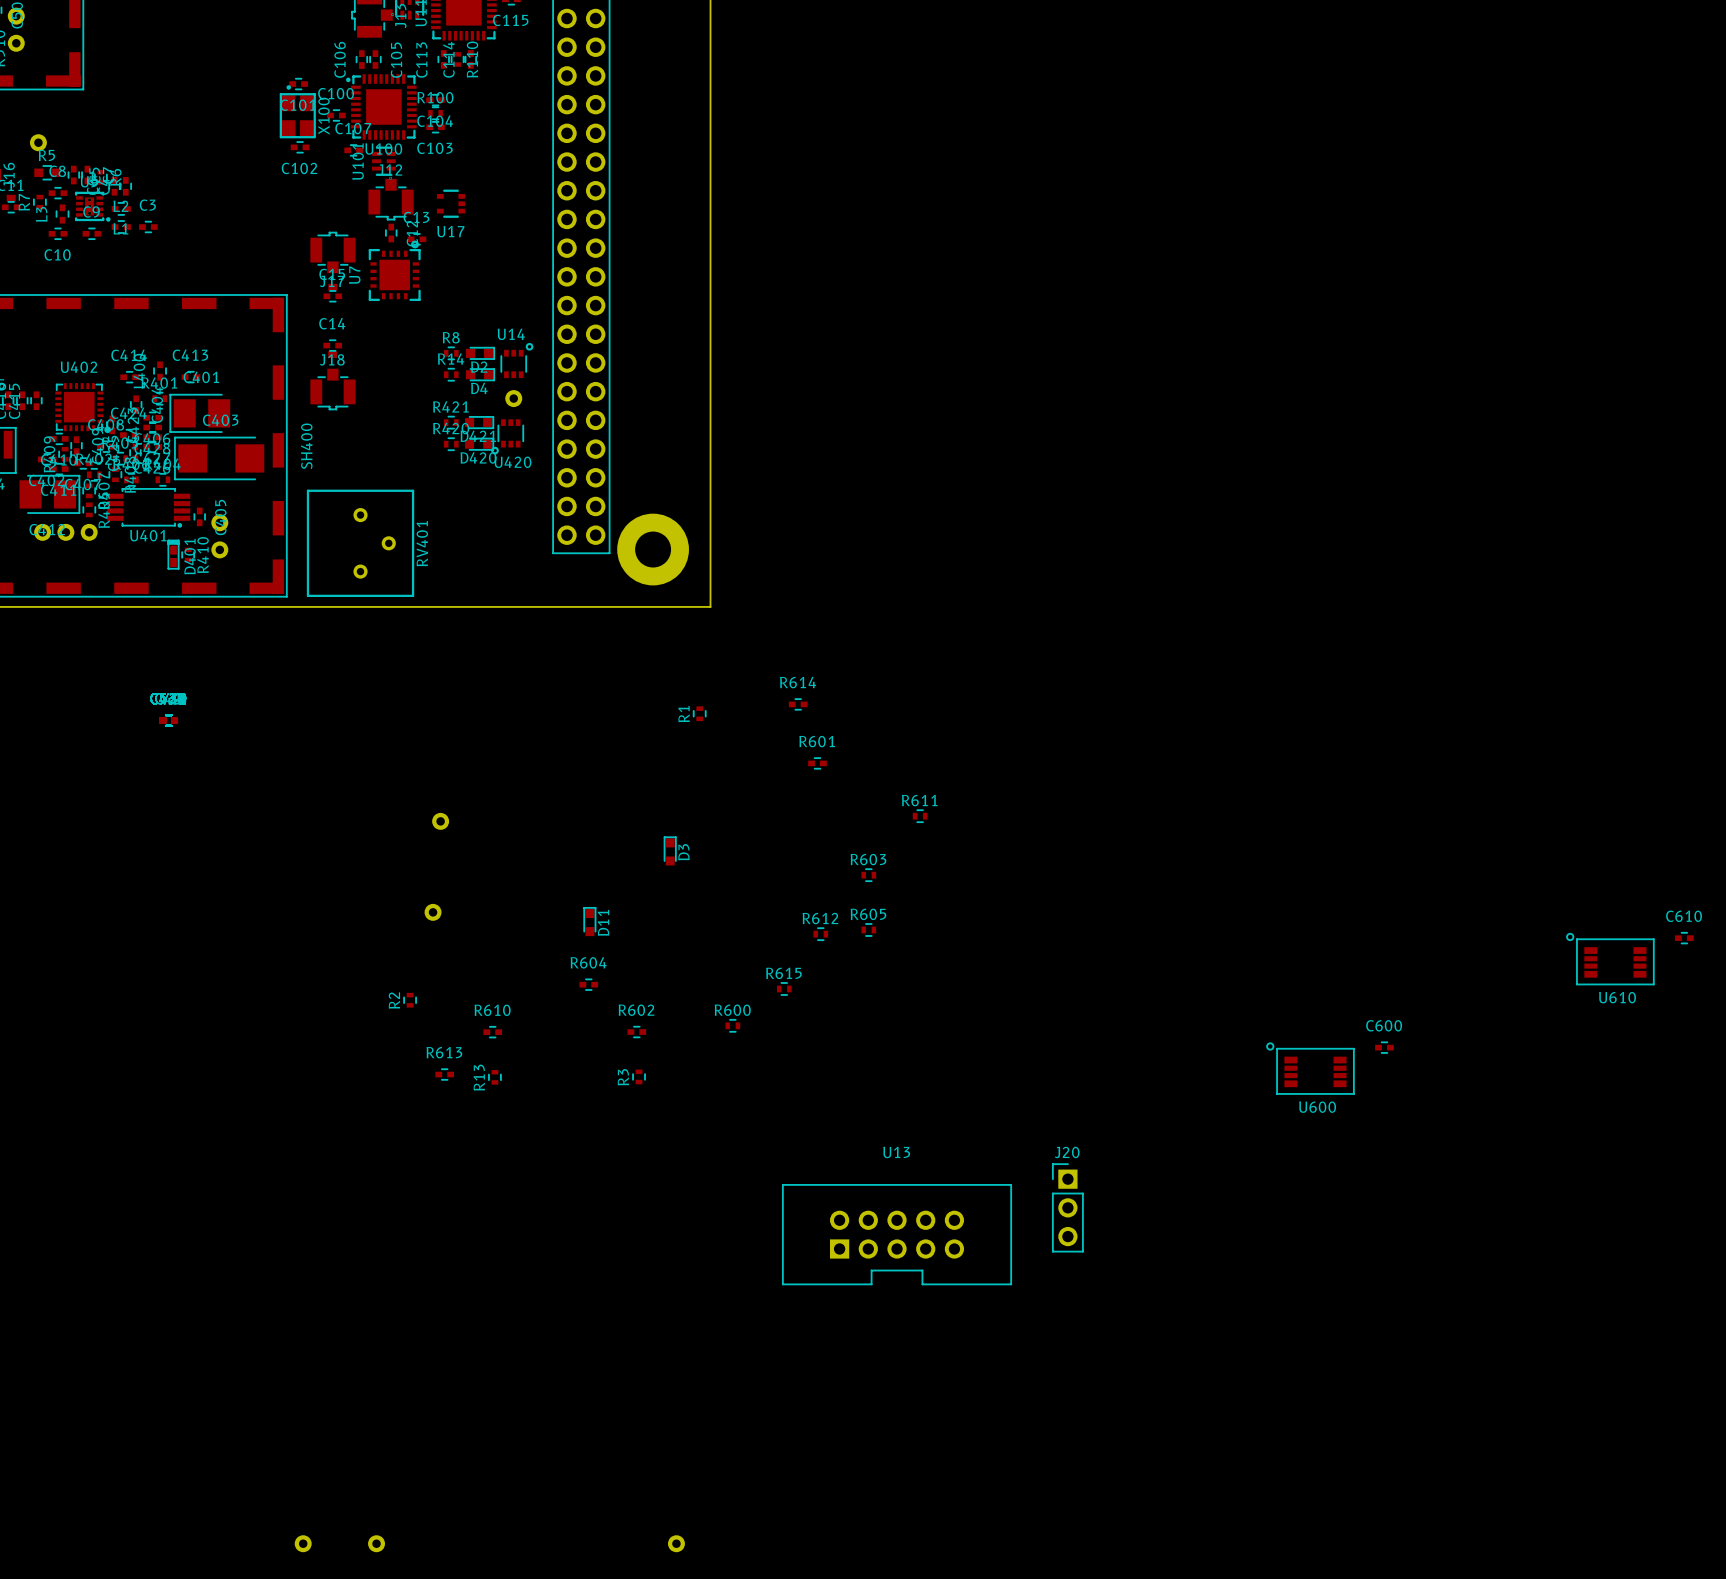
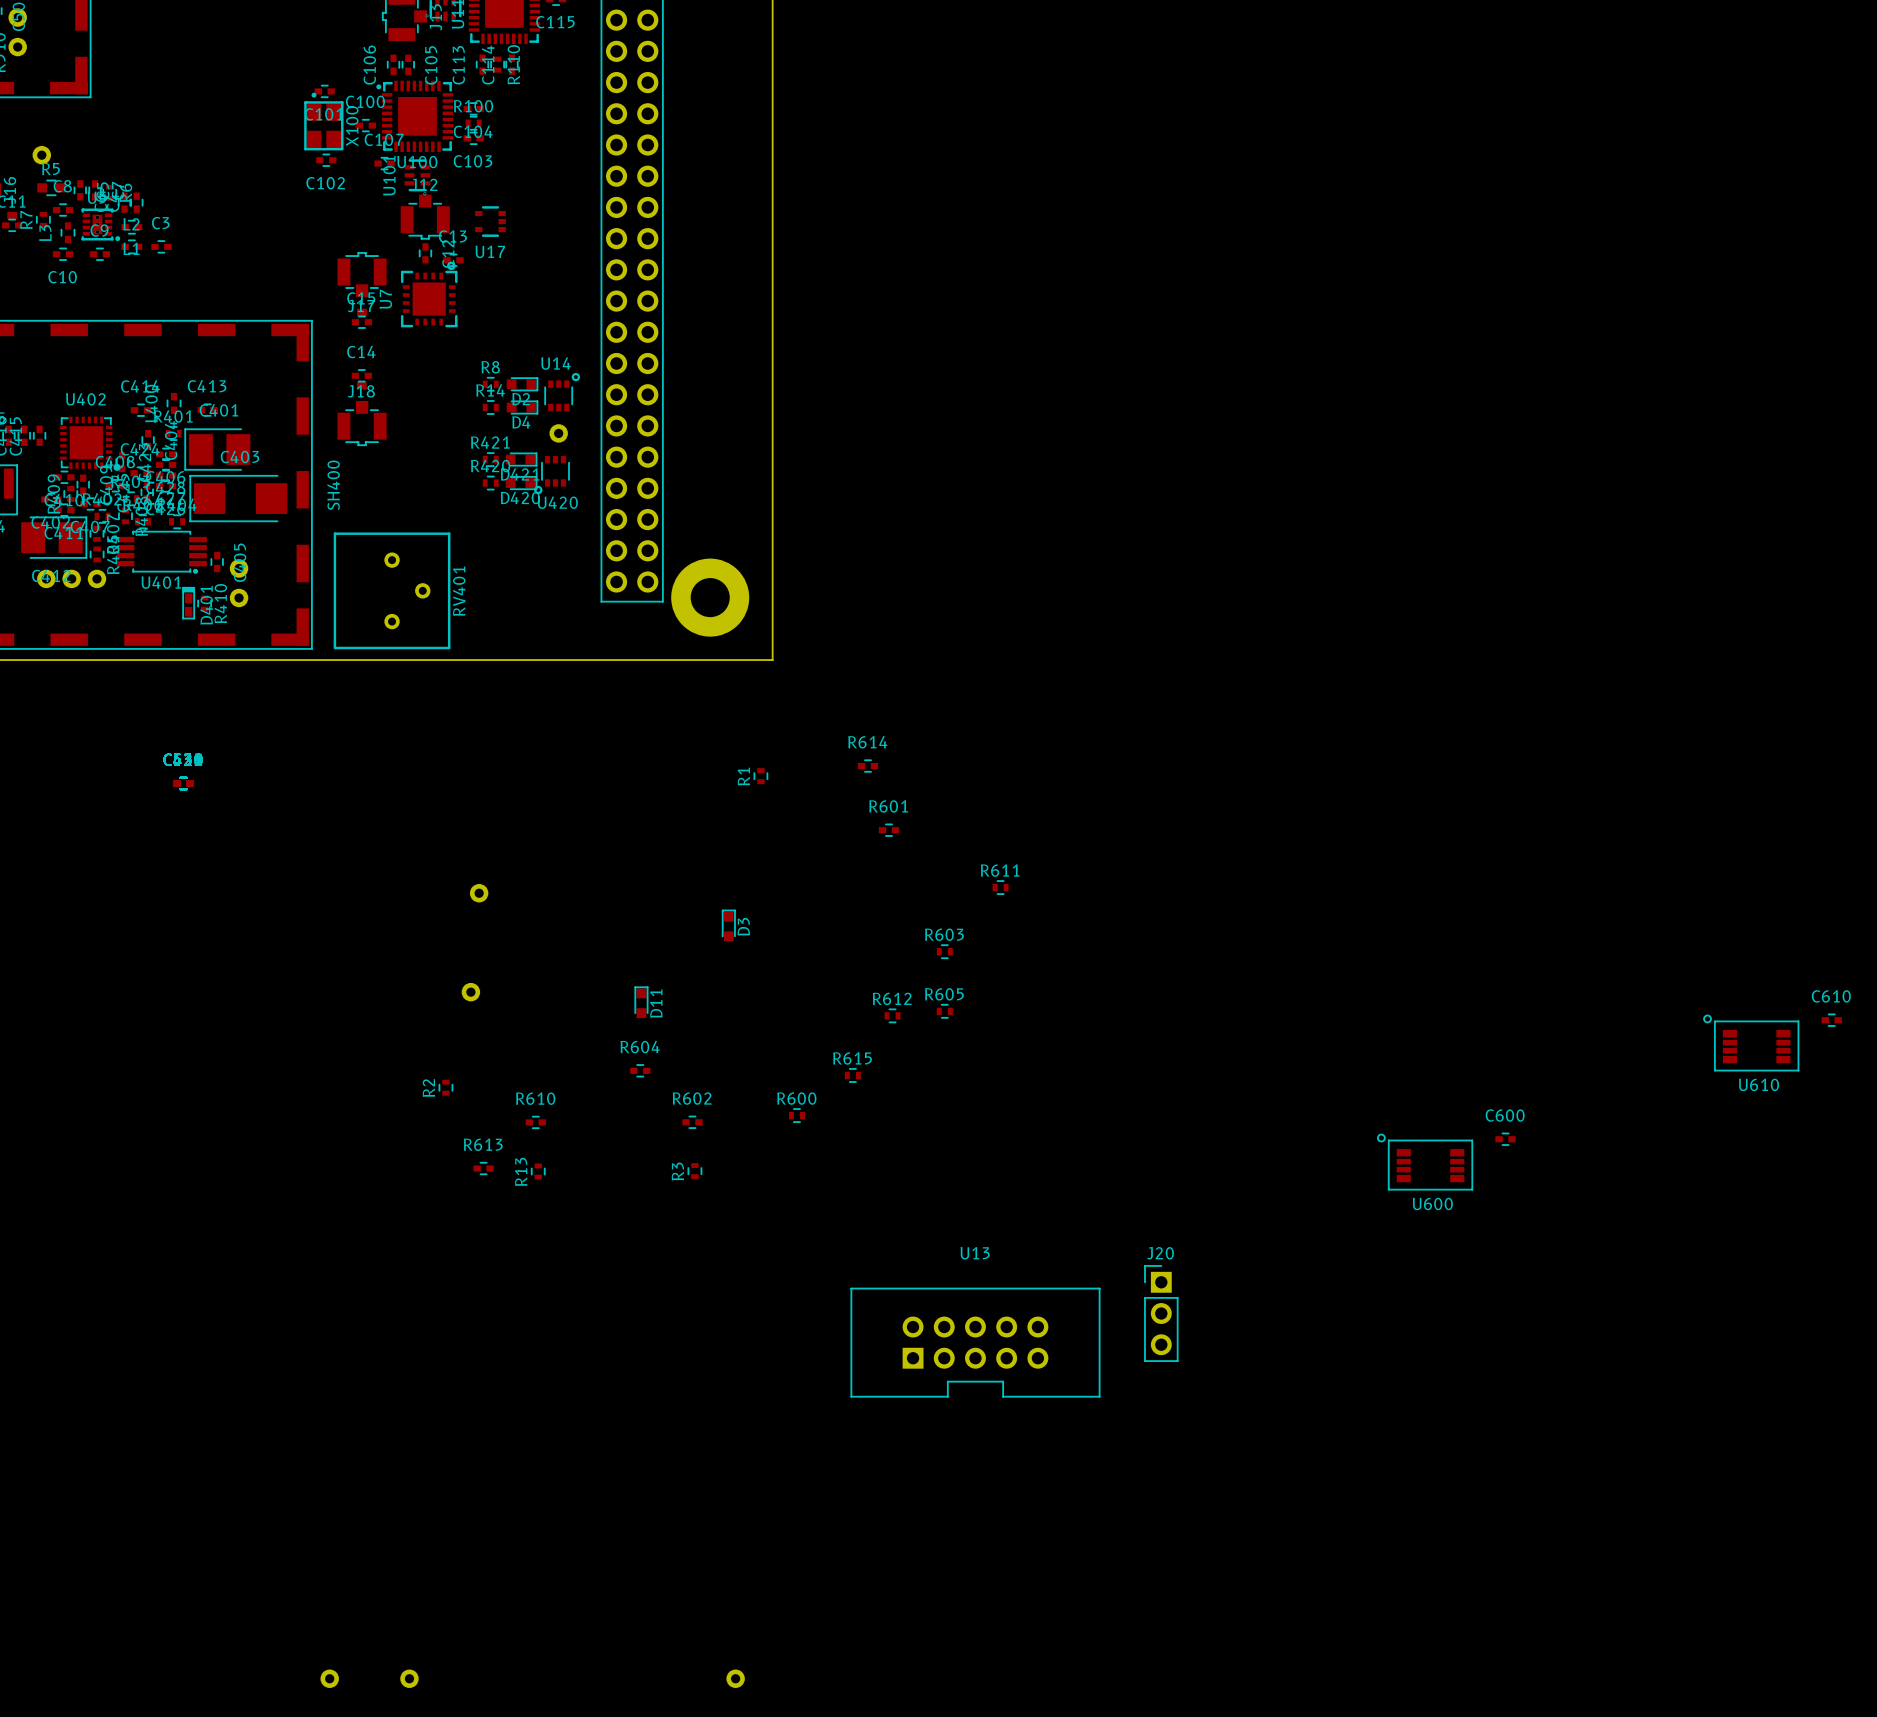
part: (168, 720) -> none
part: (168, 720) -> none

